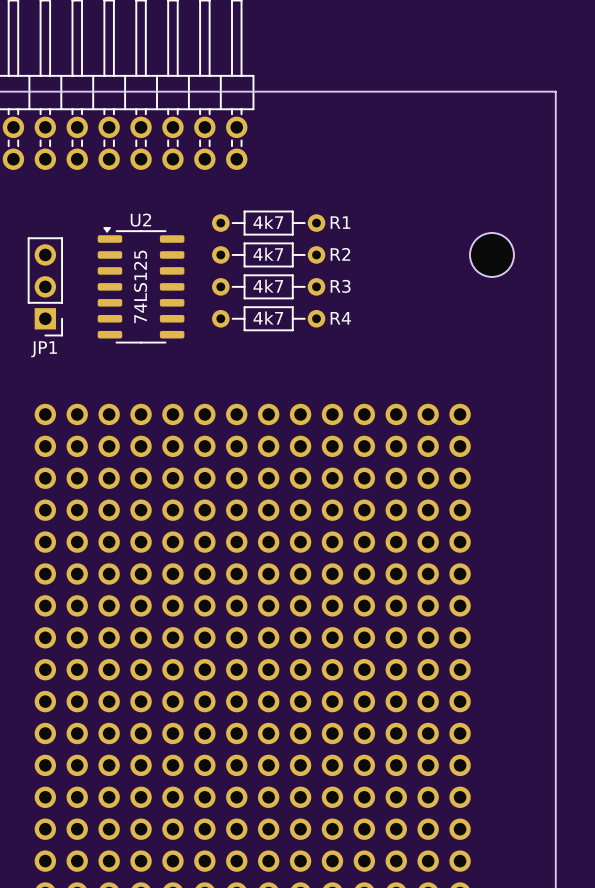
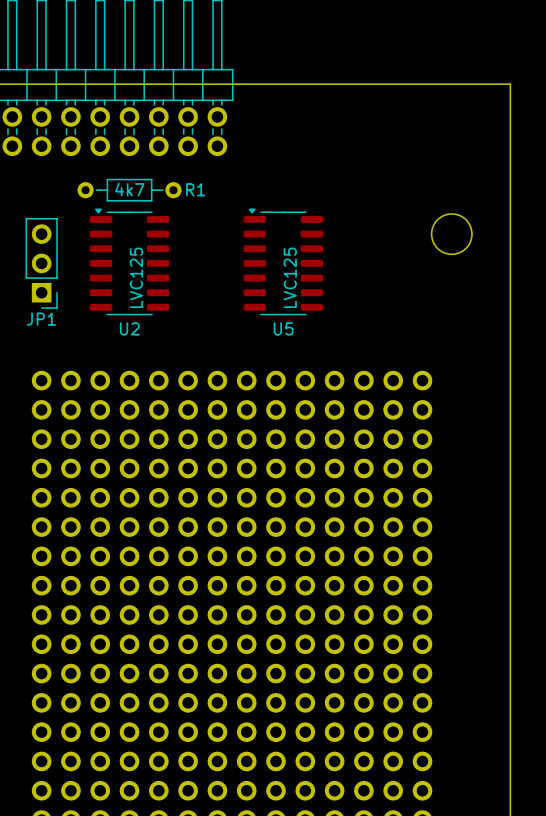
U2 name position: U2 (140, 220) -> U2 (129, 328)
R1 position: (268, 223) -> (129, 190)
R2: 4k7 (268, 254) -> none
U5: none -> (283, 261)
U2 value: 74LS125 (140, 286) -> none
R3: 4k7 (268, 286) -> none
text: none -> LVC125 (136, 277)
text: none -> LVC125 (290, 277)
R4: 4k7 (268, 318) -> none

